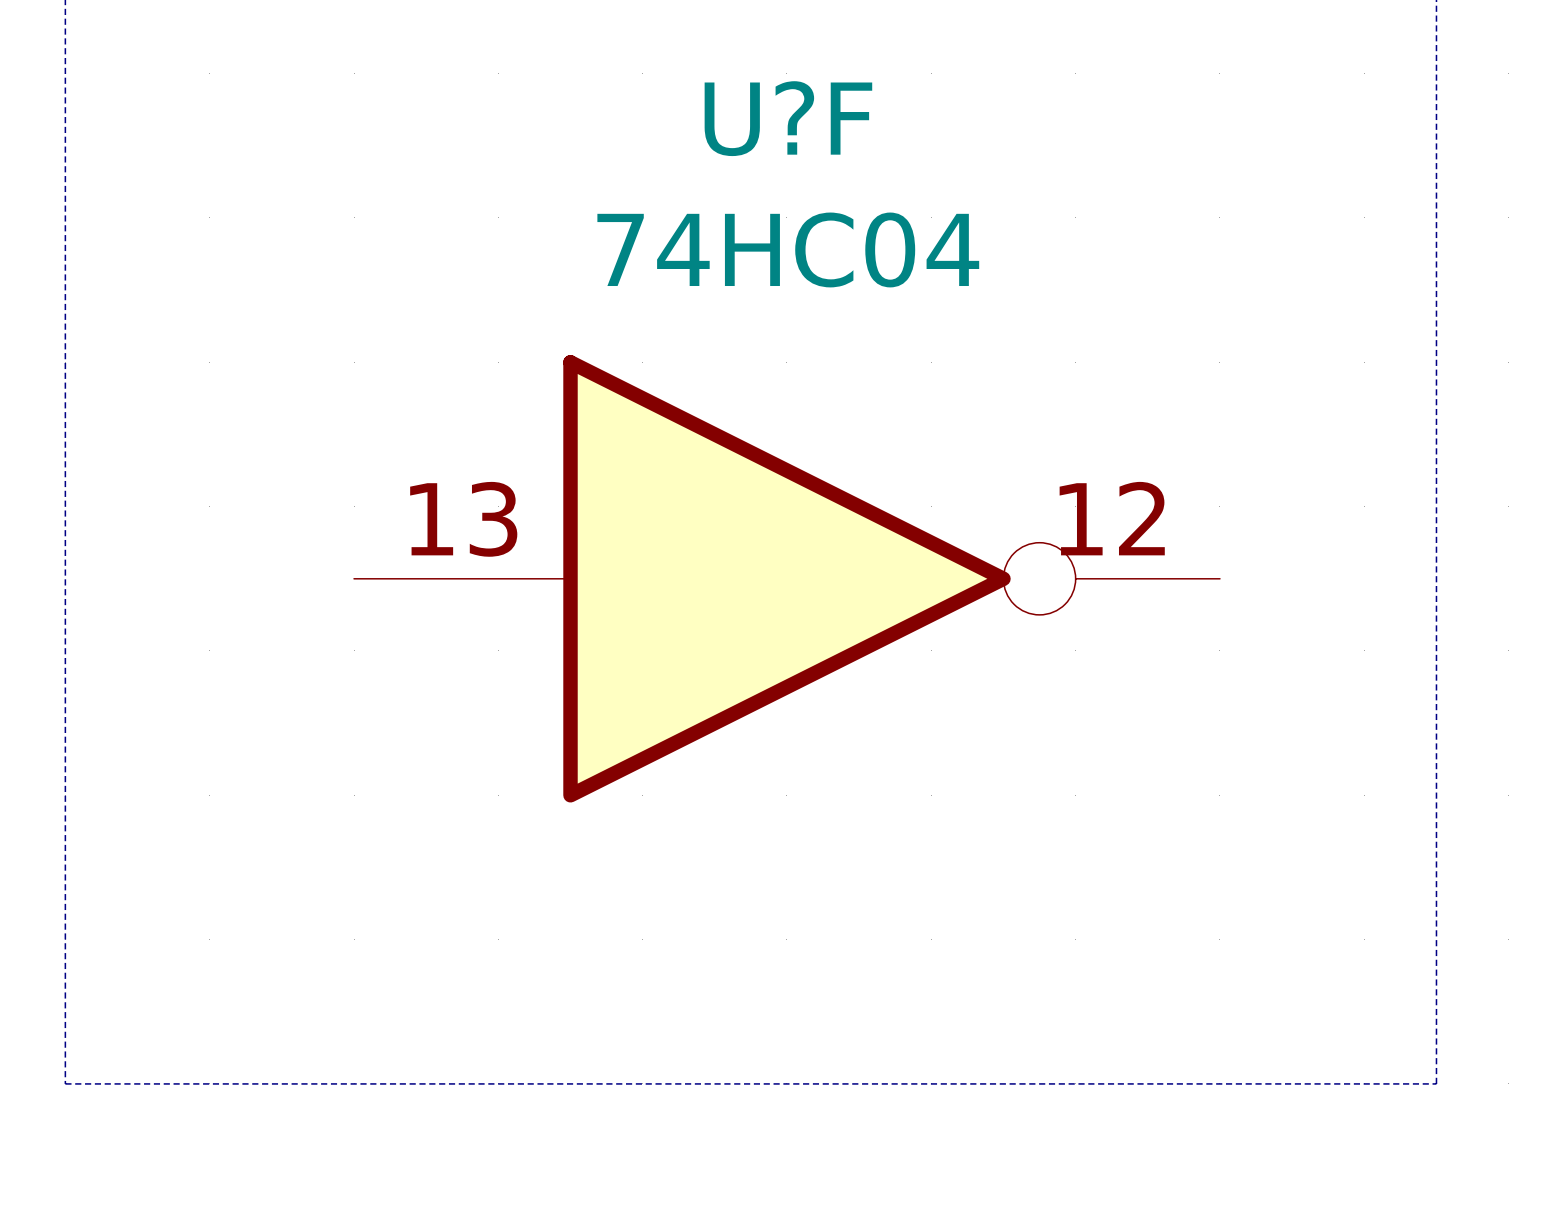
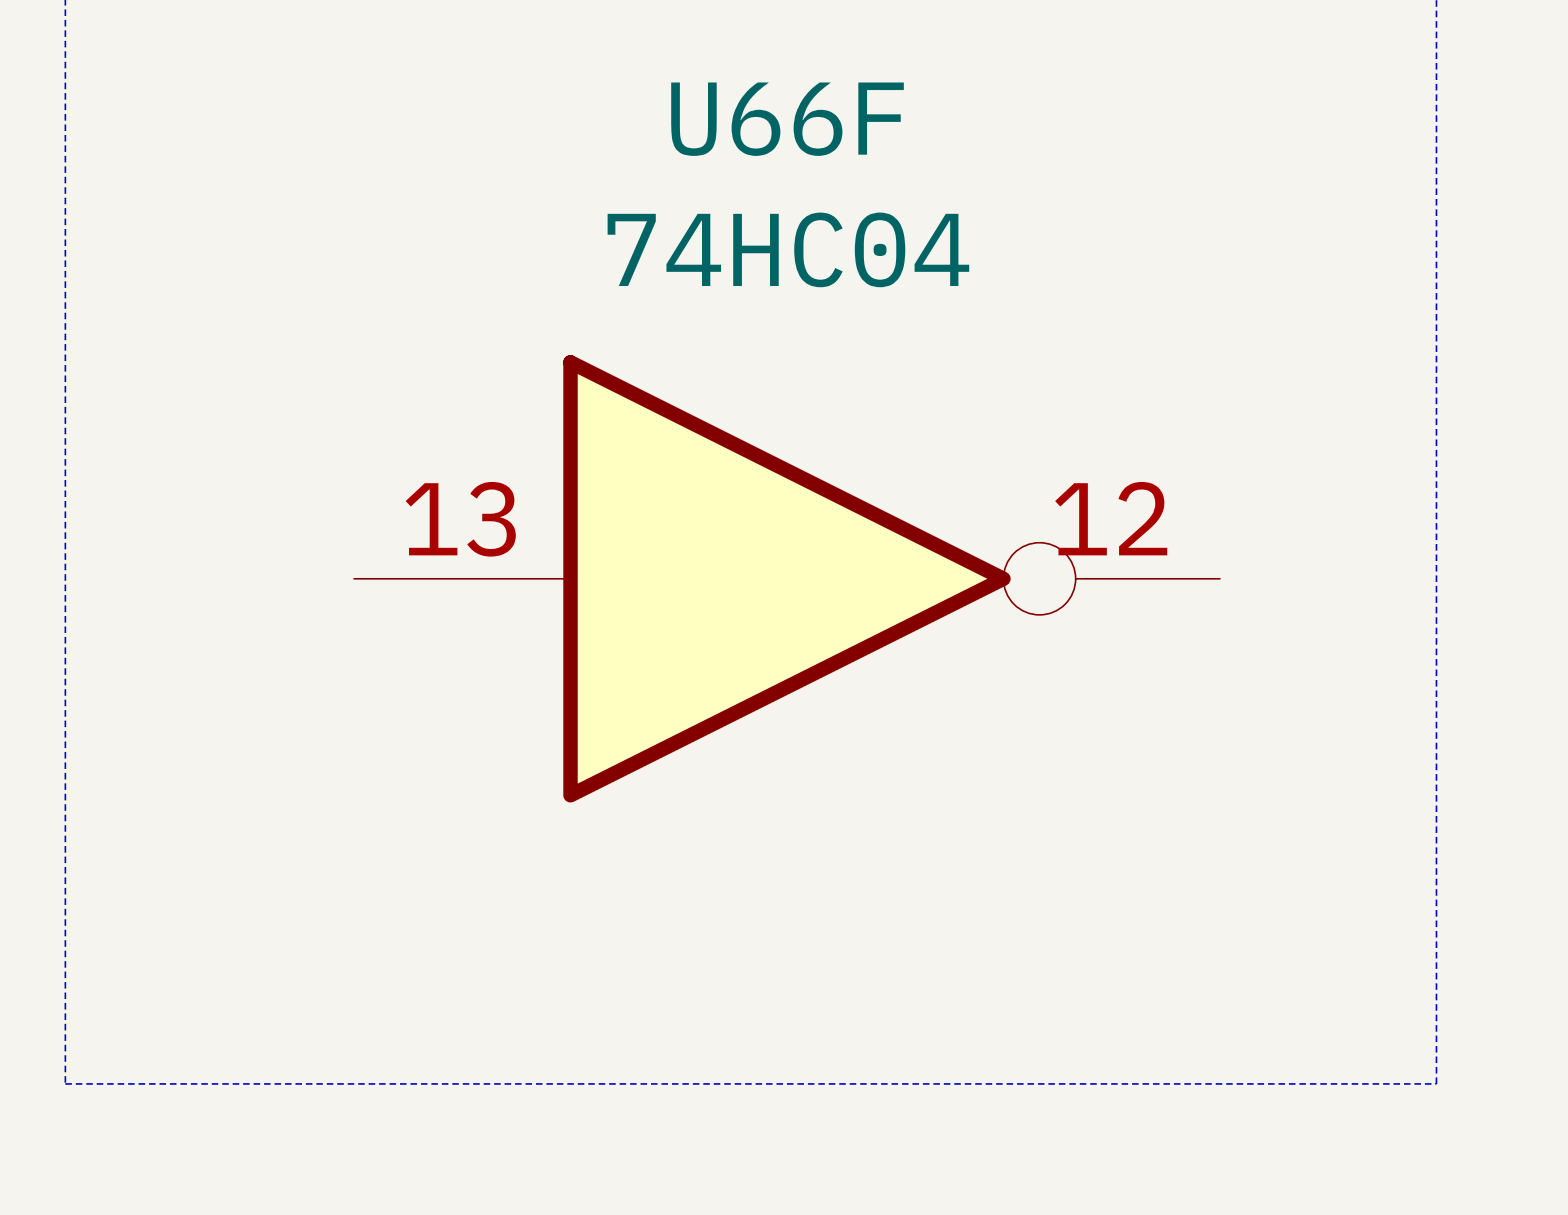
U?F name: U?F (788, 118) -> U66F (787, 119)

